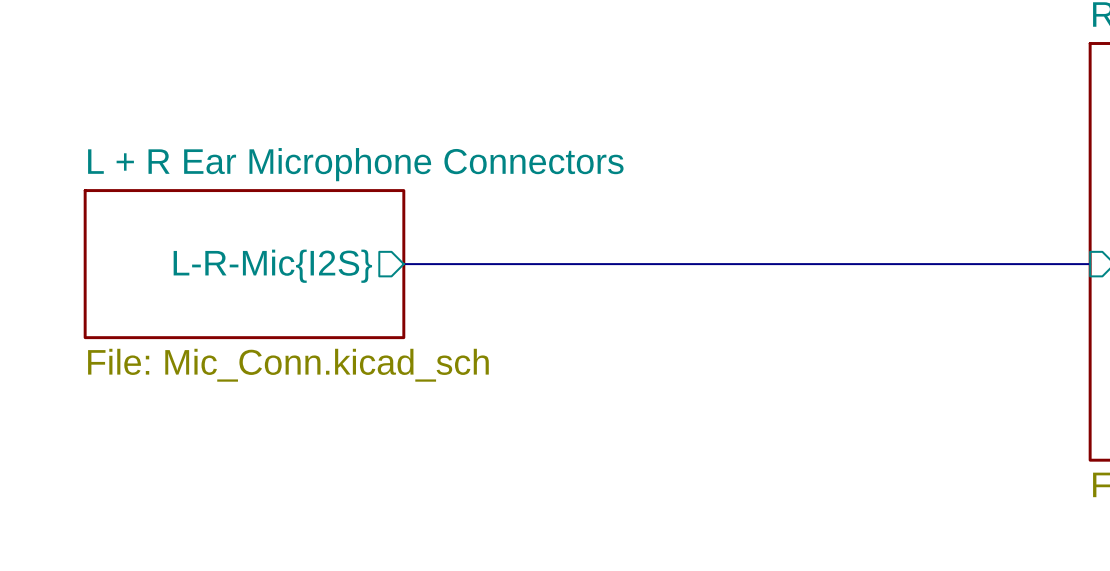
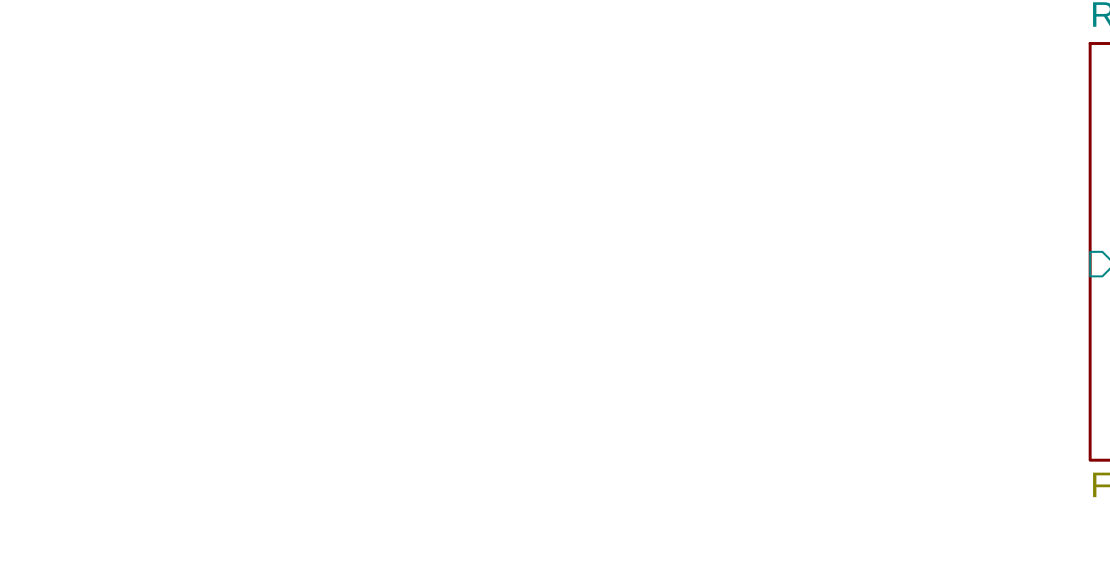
sheet L + R Ear Microphone Connectors: File: Mic_Conn.kicad_sch (244, 264) -> none
bus: (403, 264) (1090, 264) -> none
sheet pin: L-R-Mic{I2S} (272, 266) -> none

